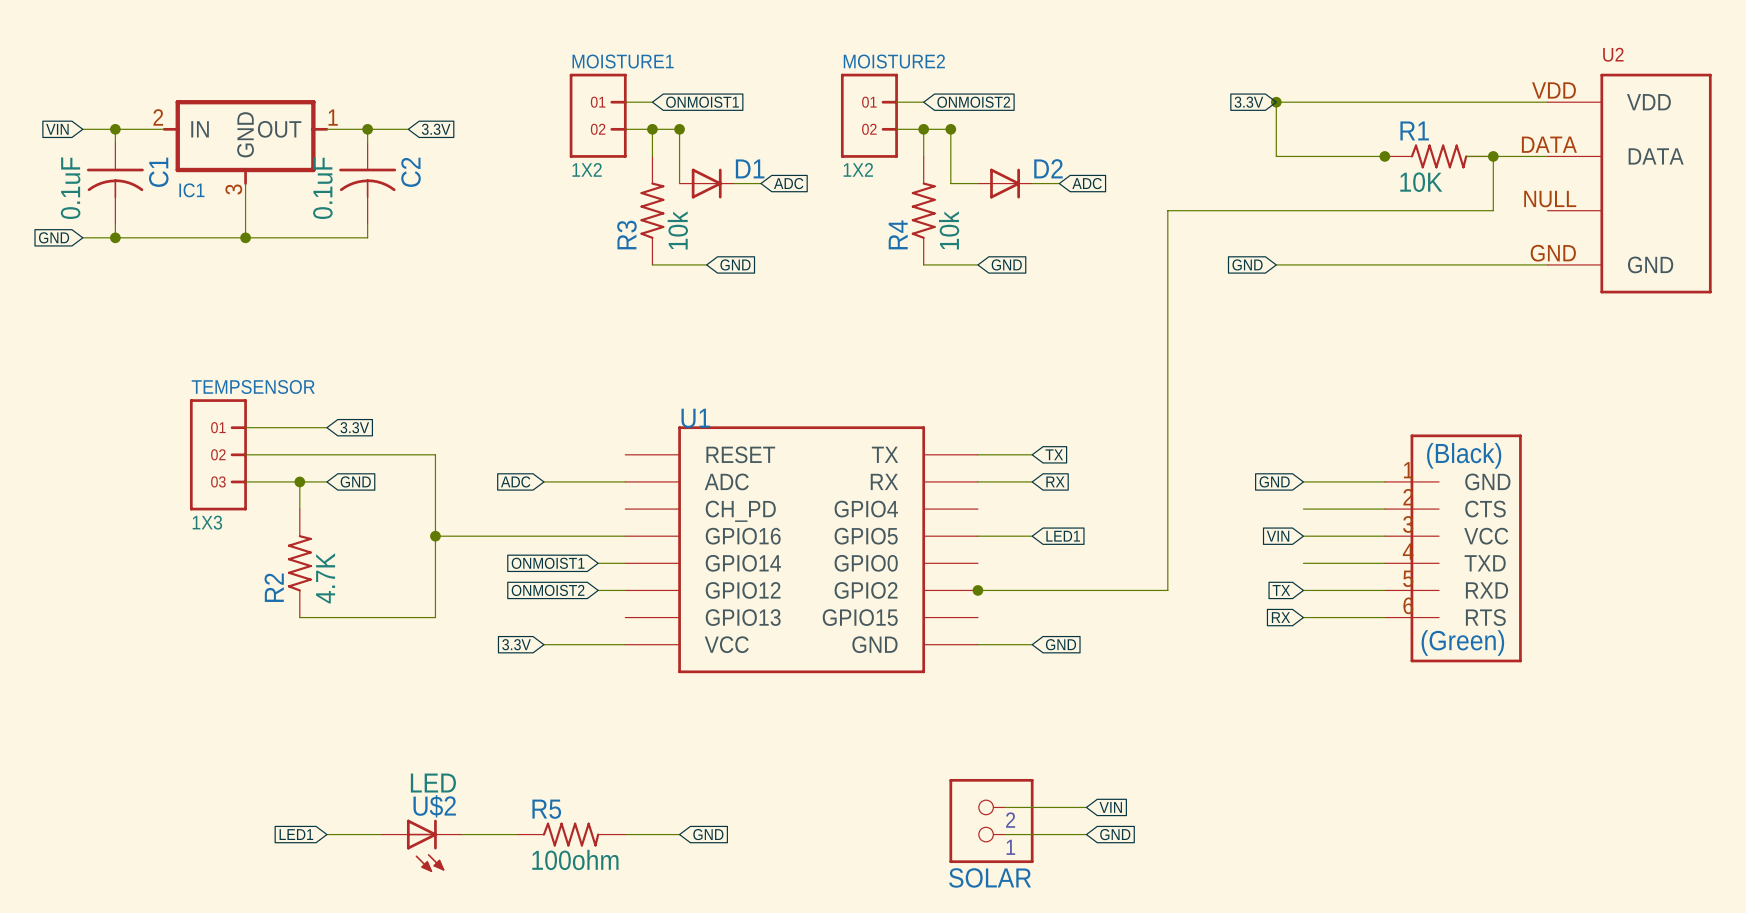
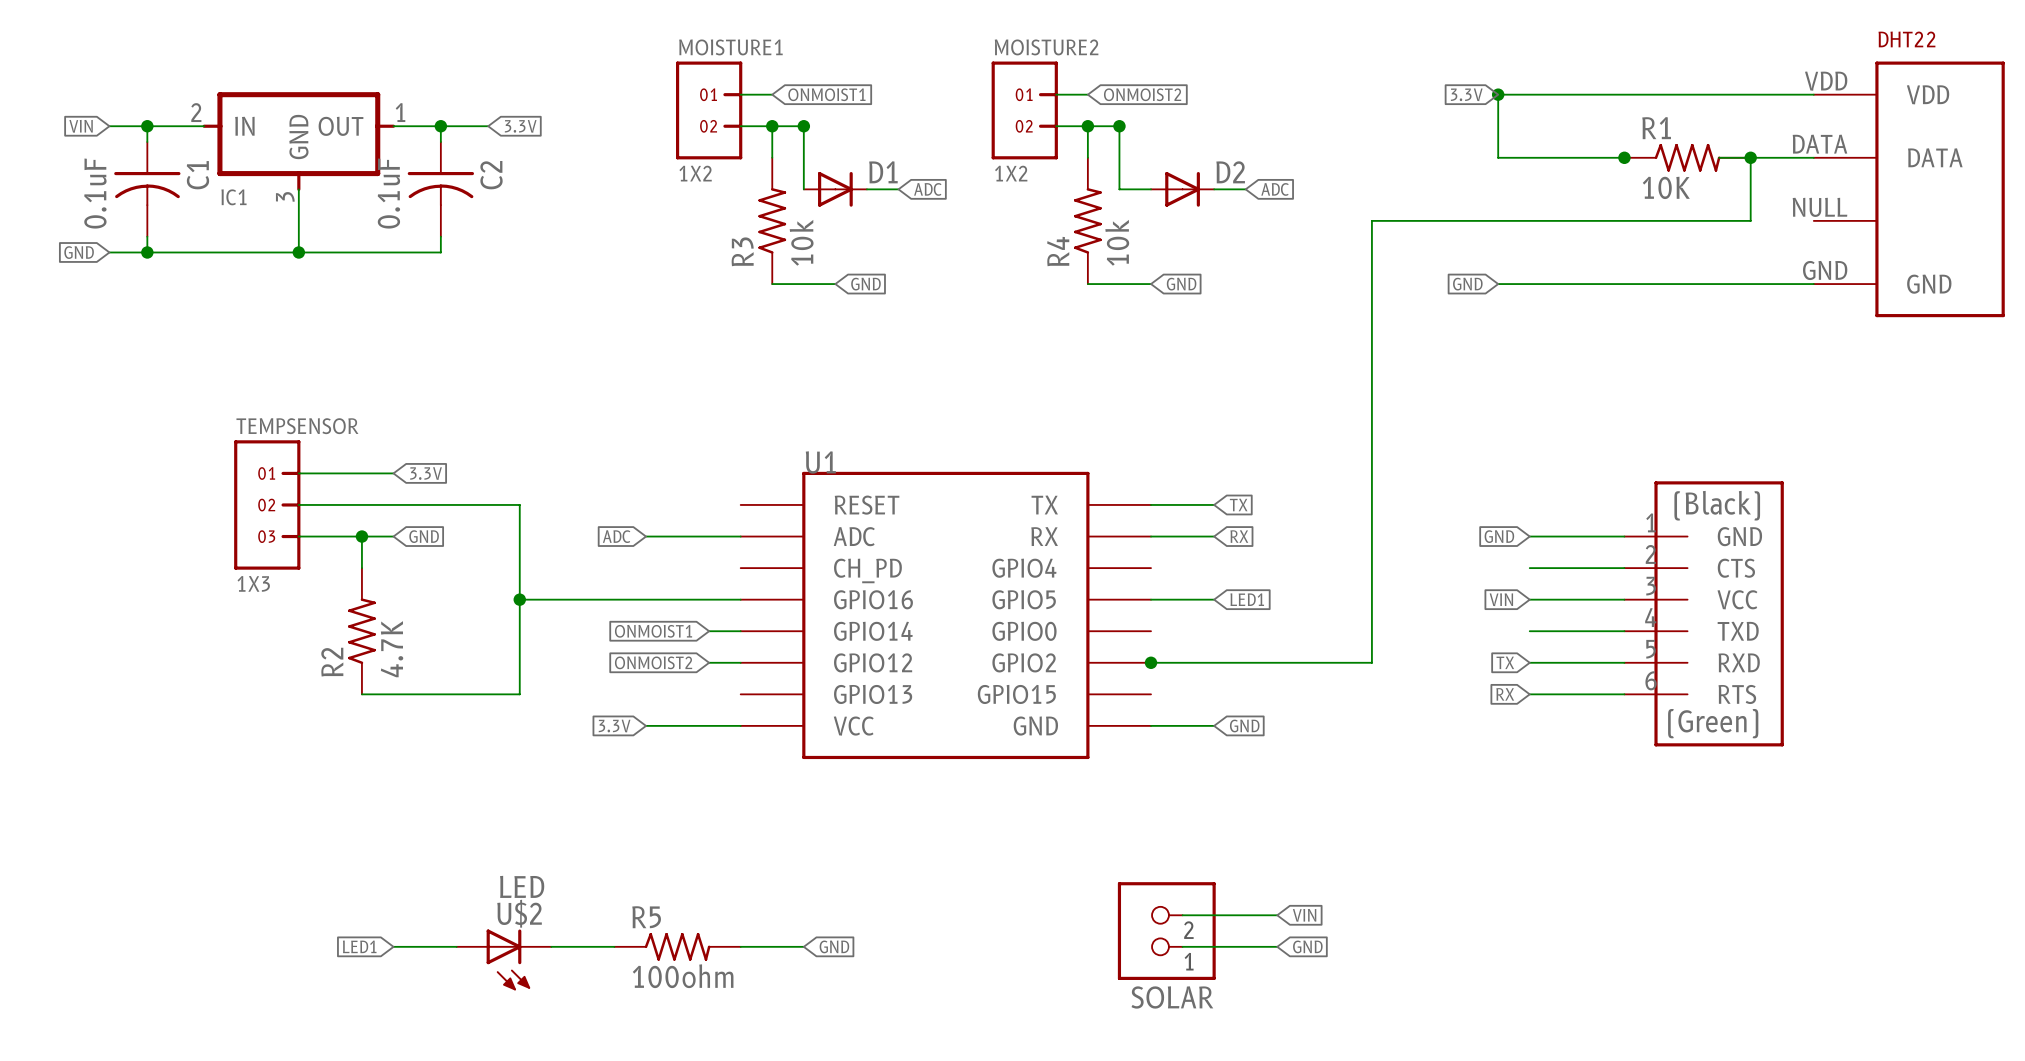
U2 name: U2 (1613, 54) -> DHT22 (1906, 39)

